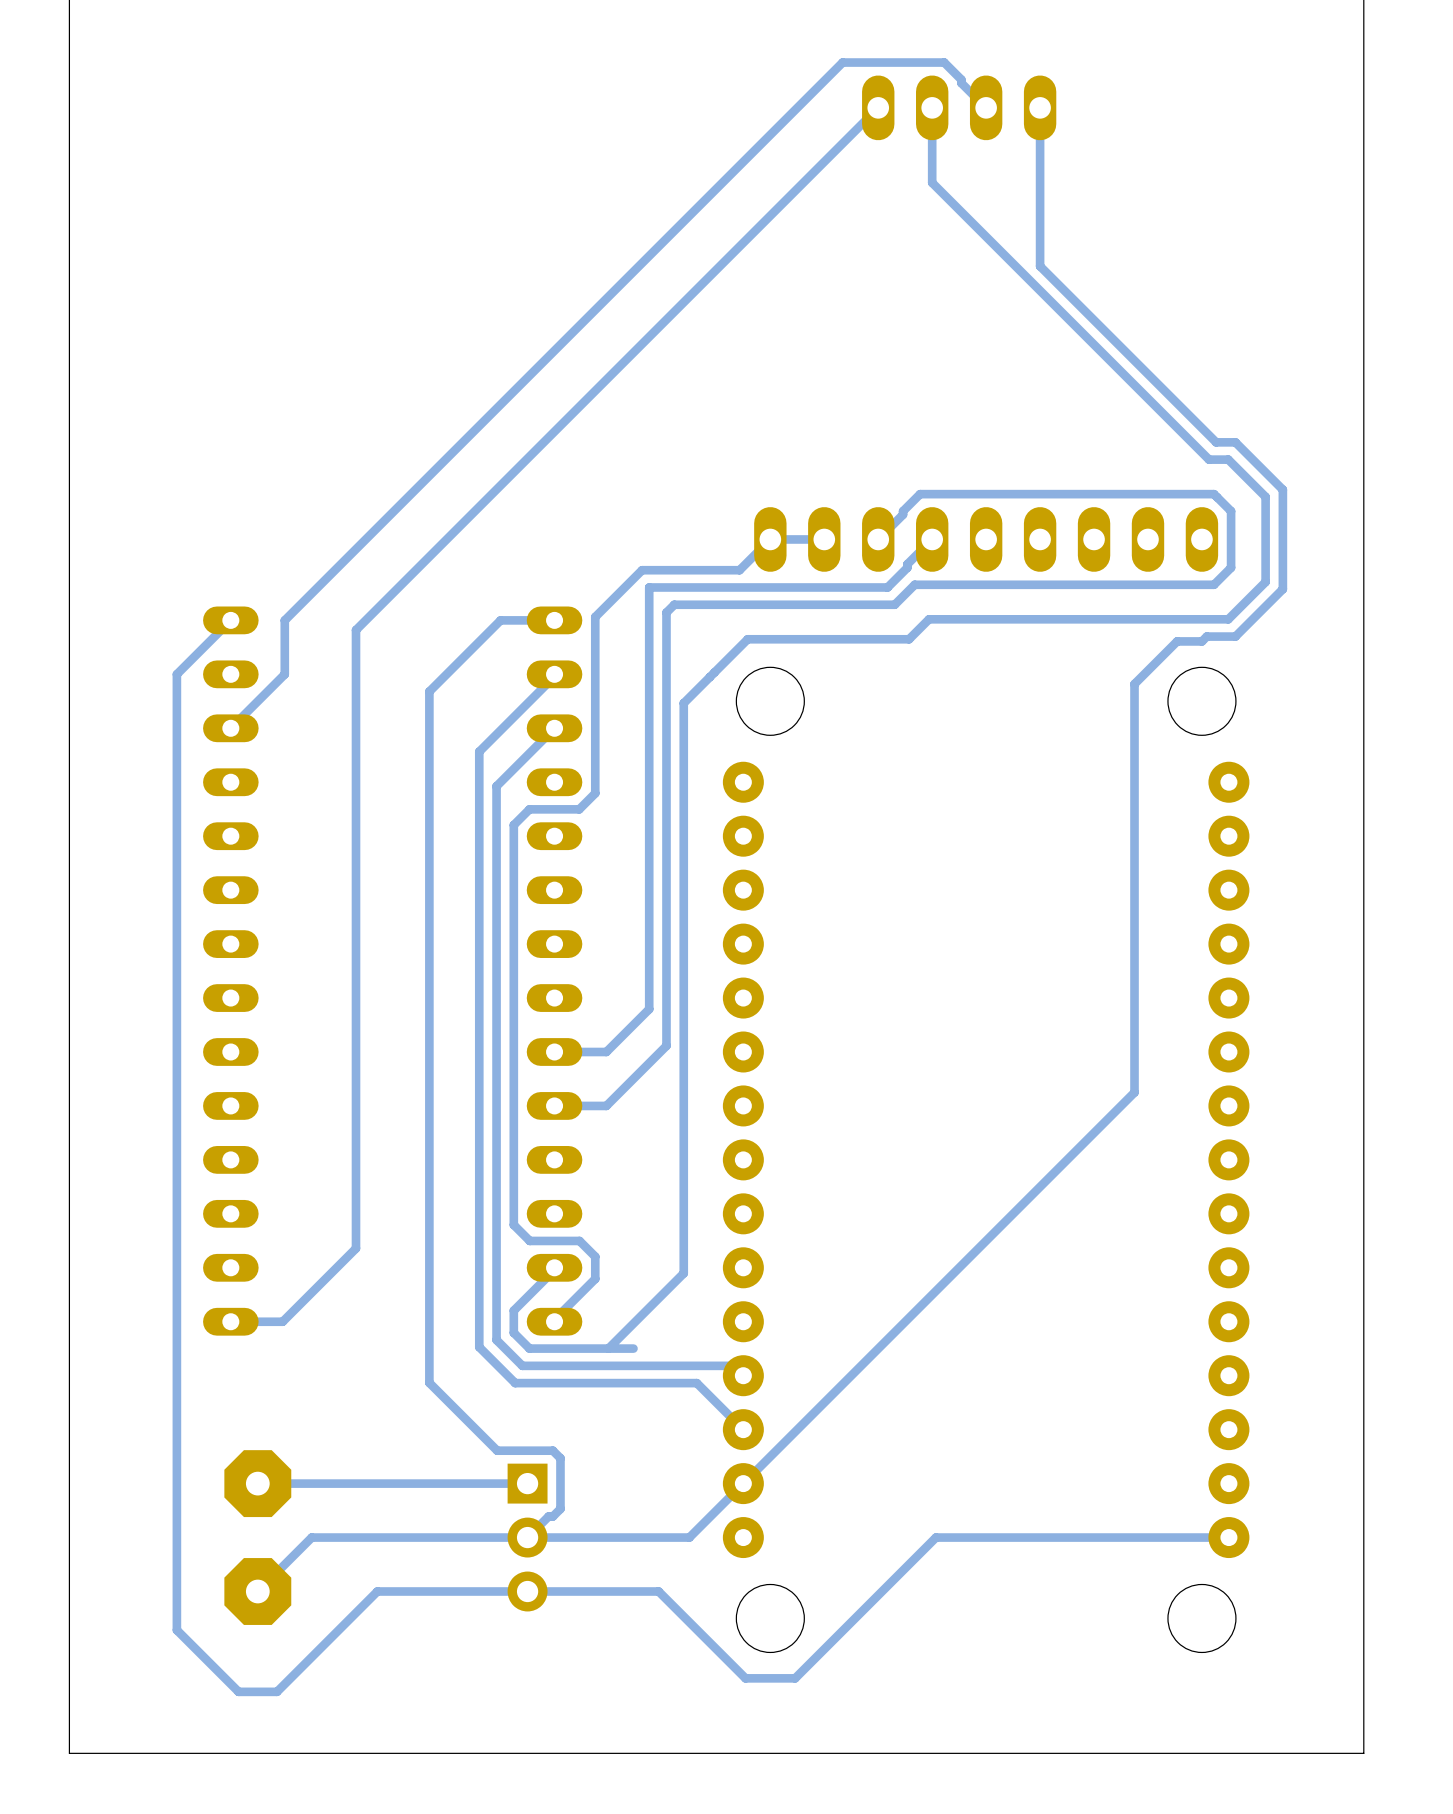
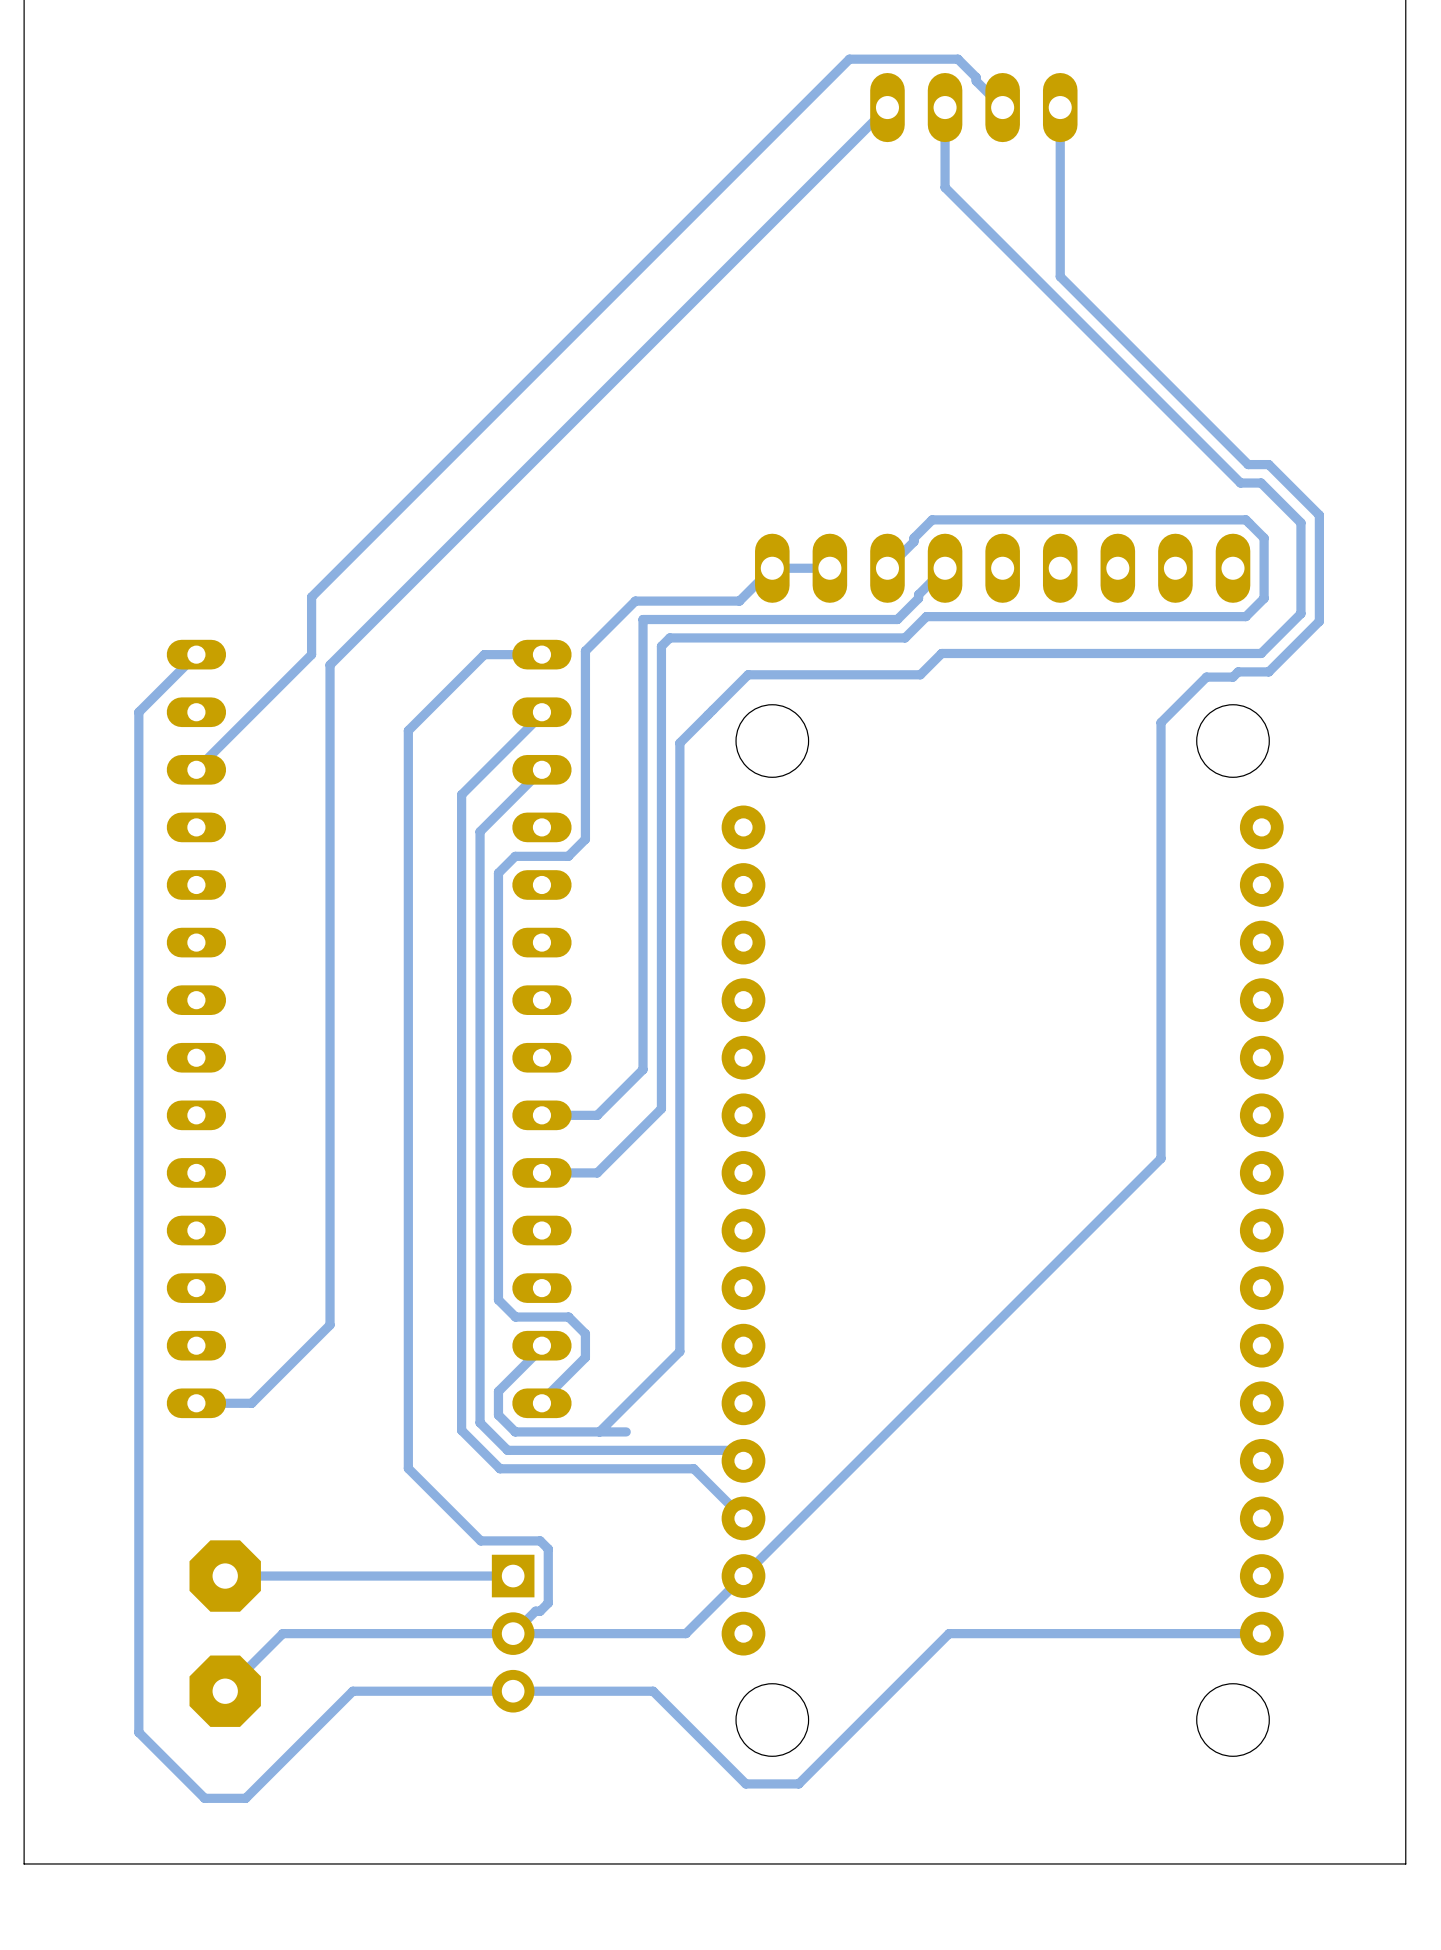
track: (338, 566) (284, 620) (284, 674) -> (311, 597) (311, 654) (254, 712)

